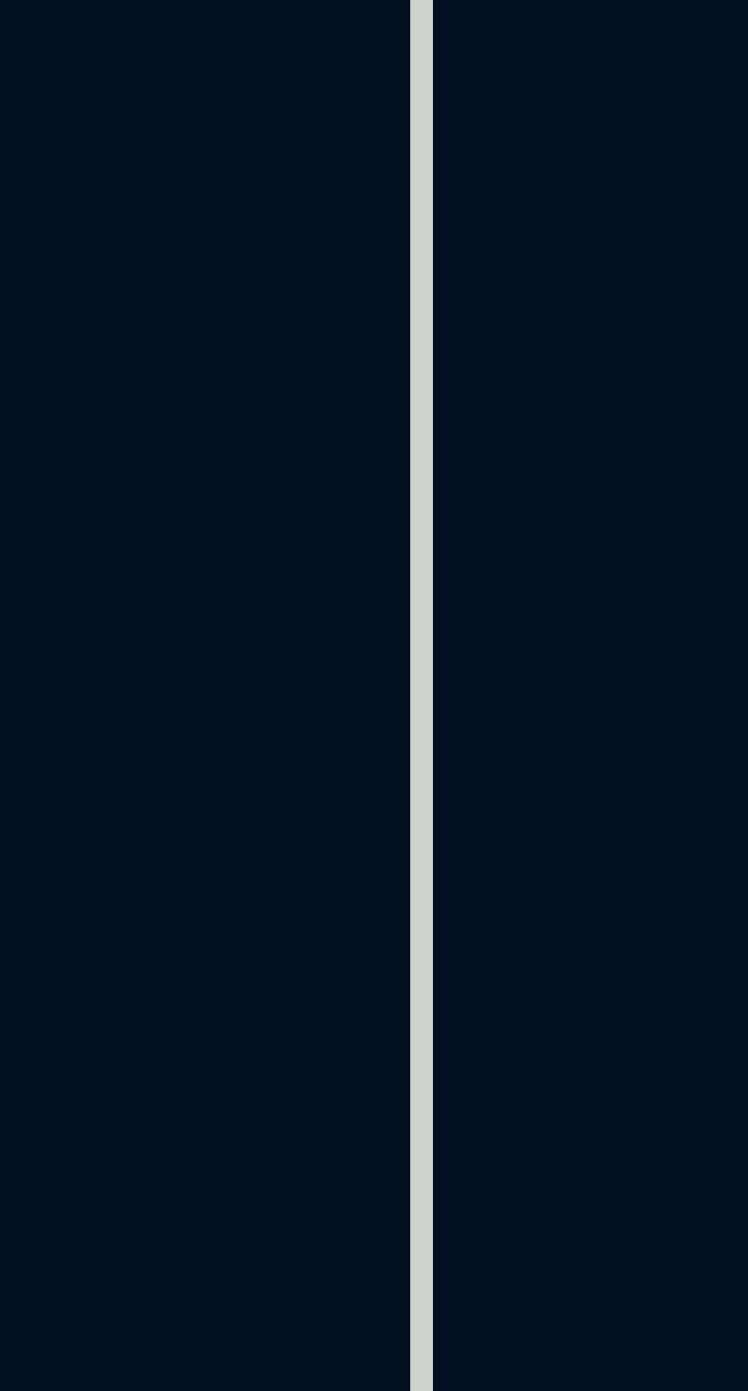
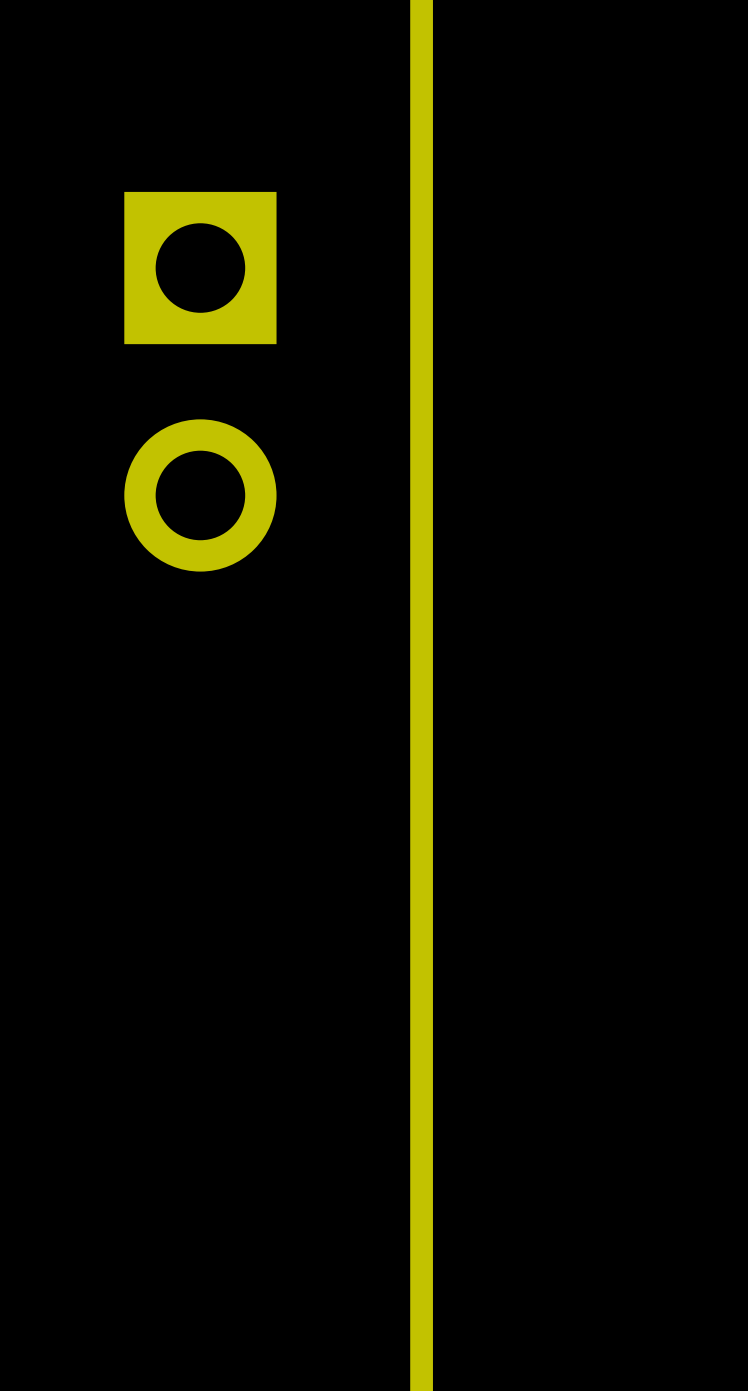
part: none -> (200, 381)

